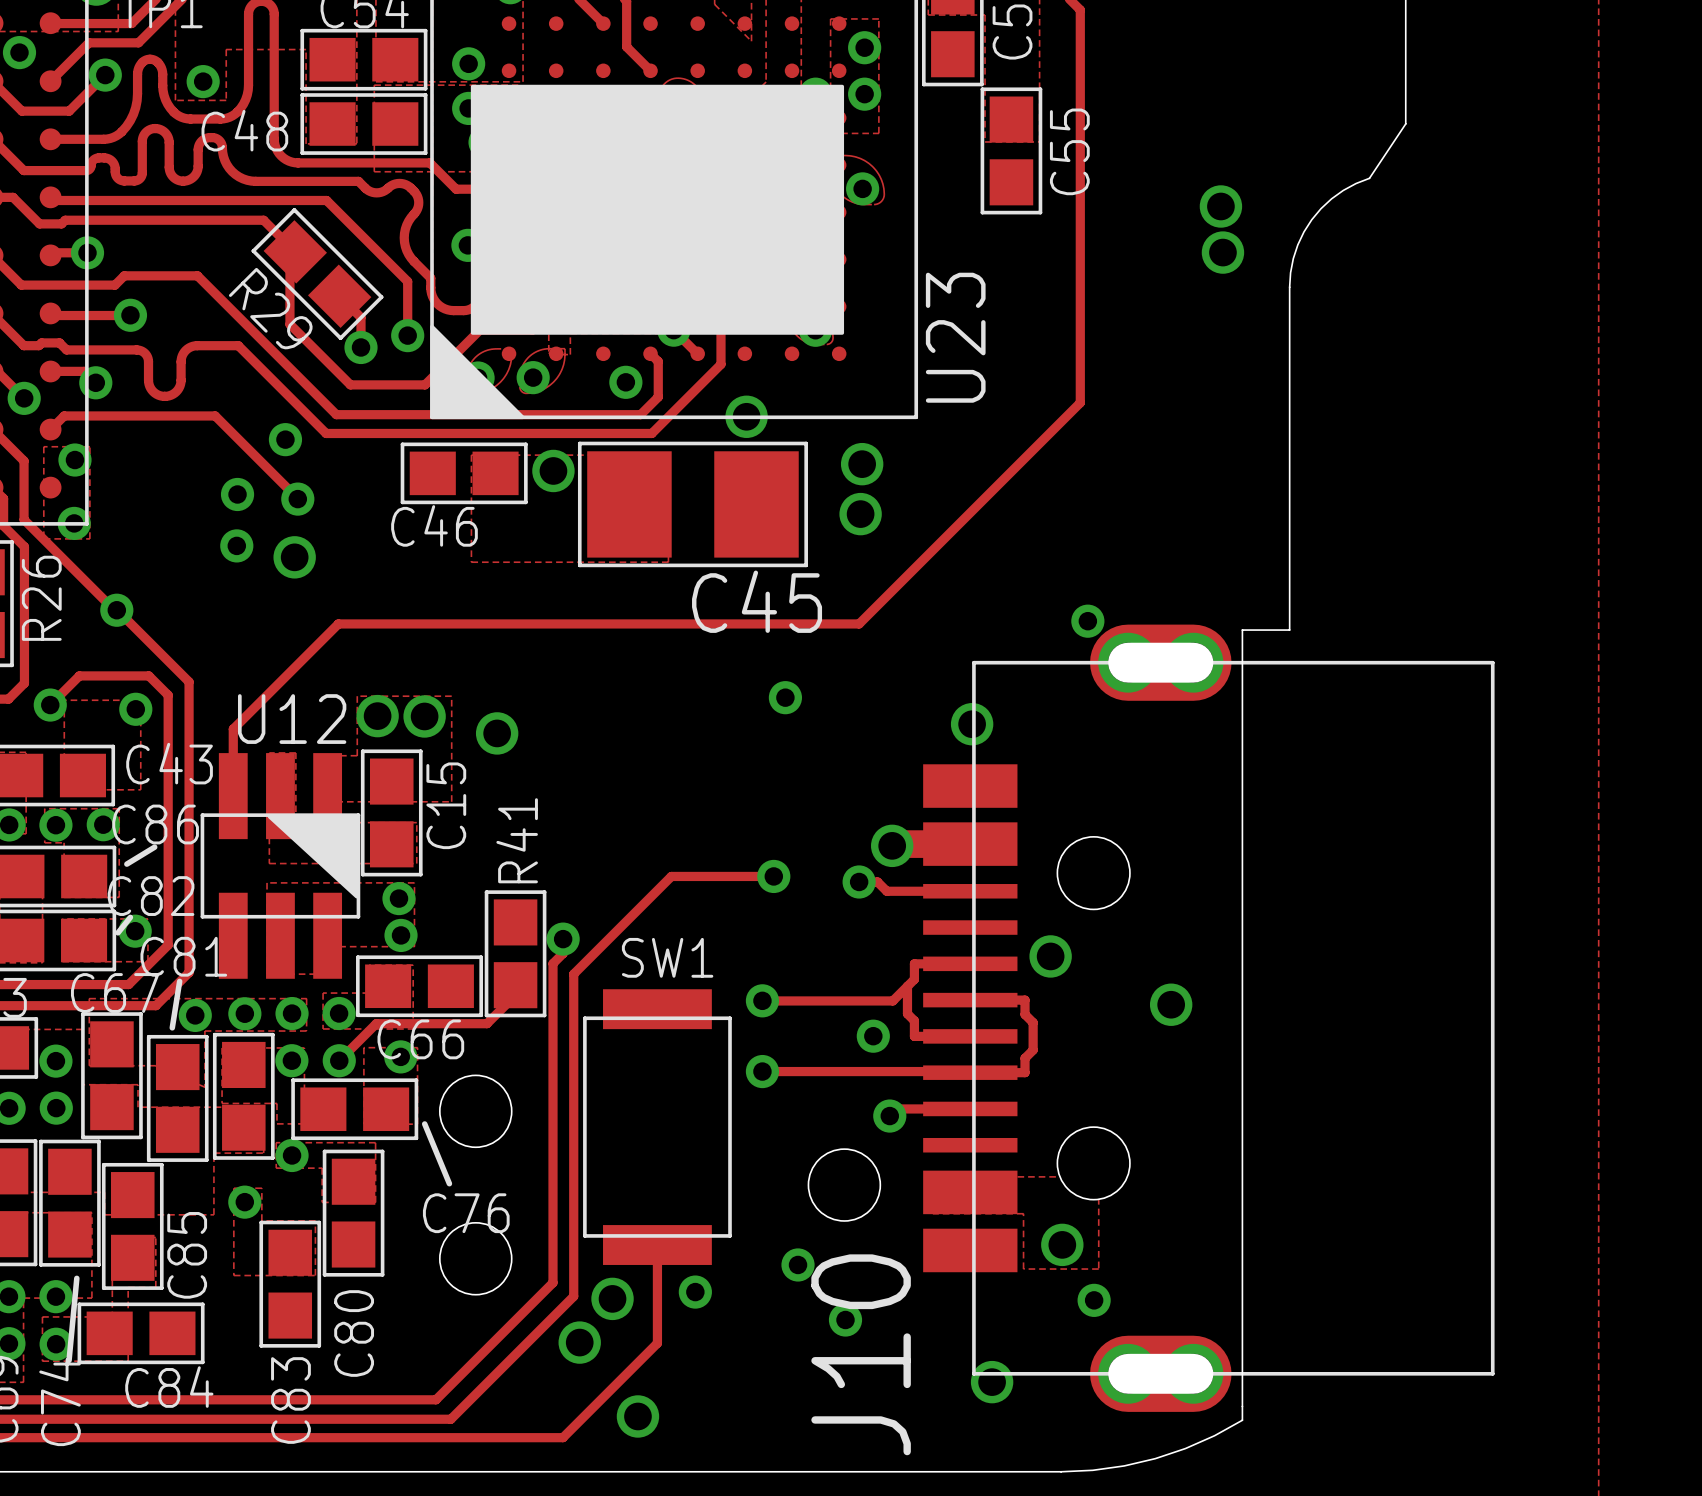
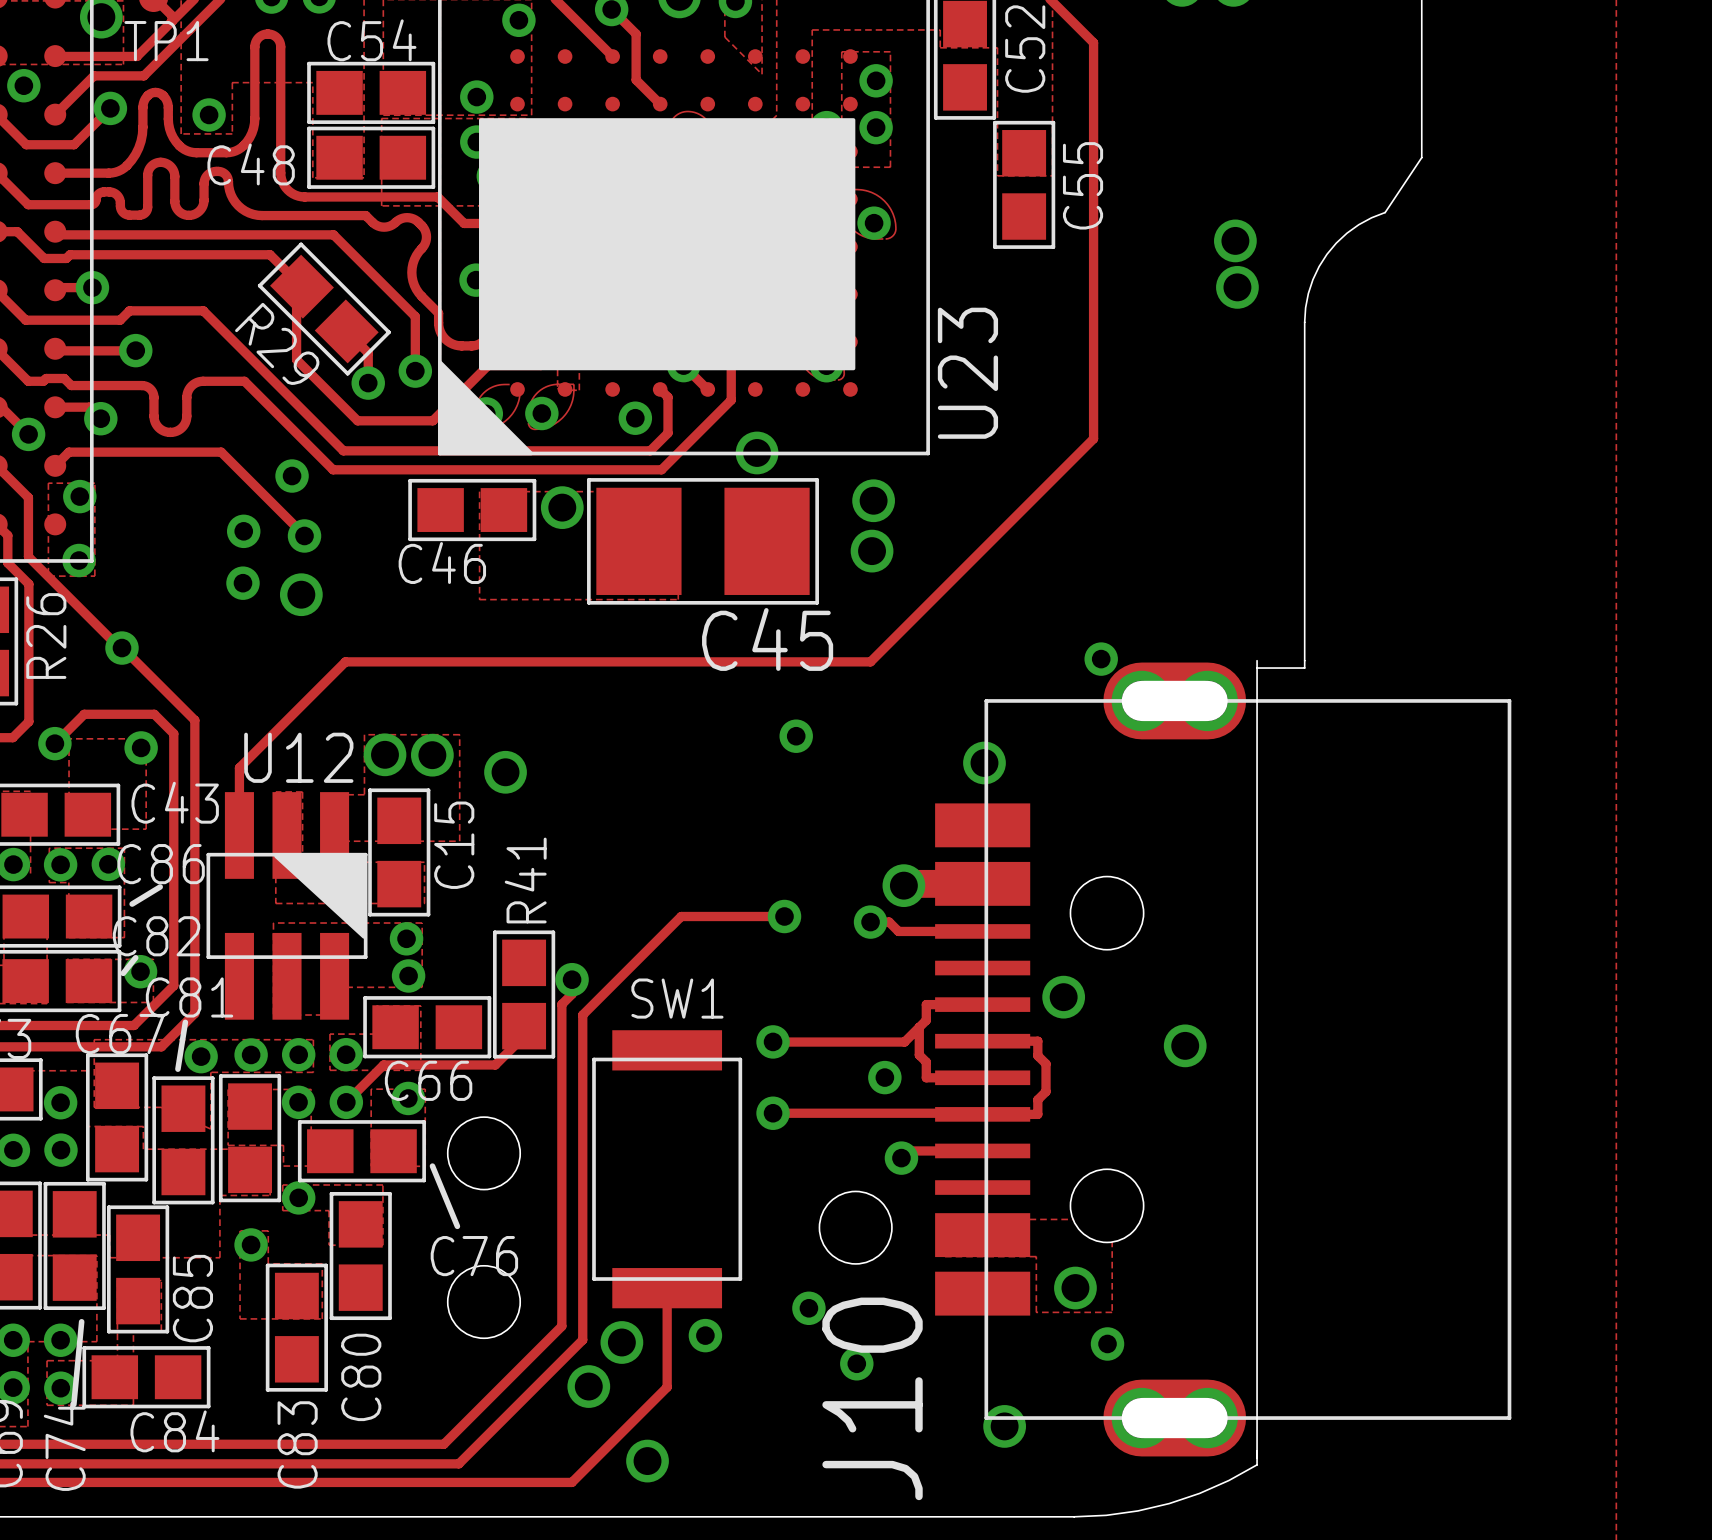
J10 footprint: [923, 624, 1495, 1412] -> [935, 660, 1512, 1459]

